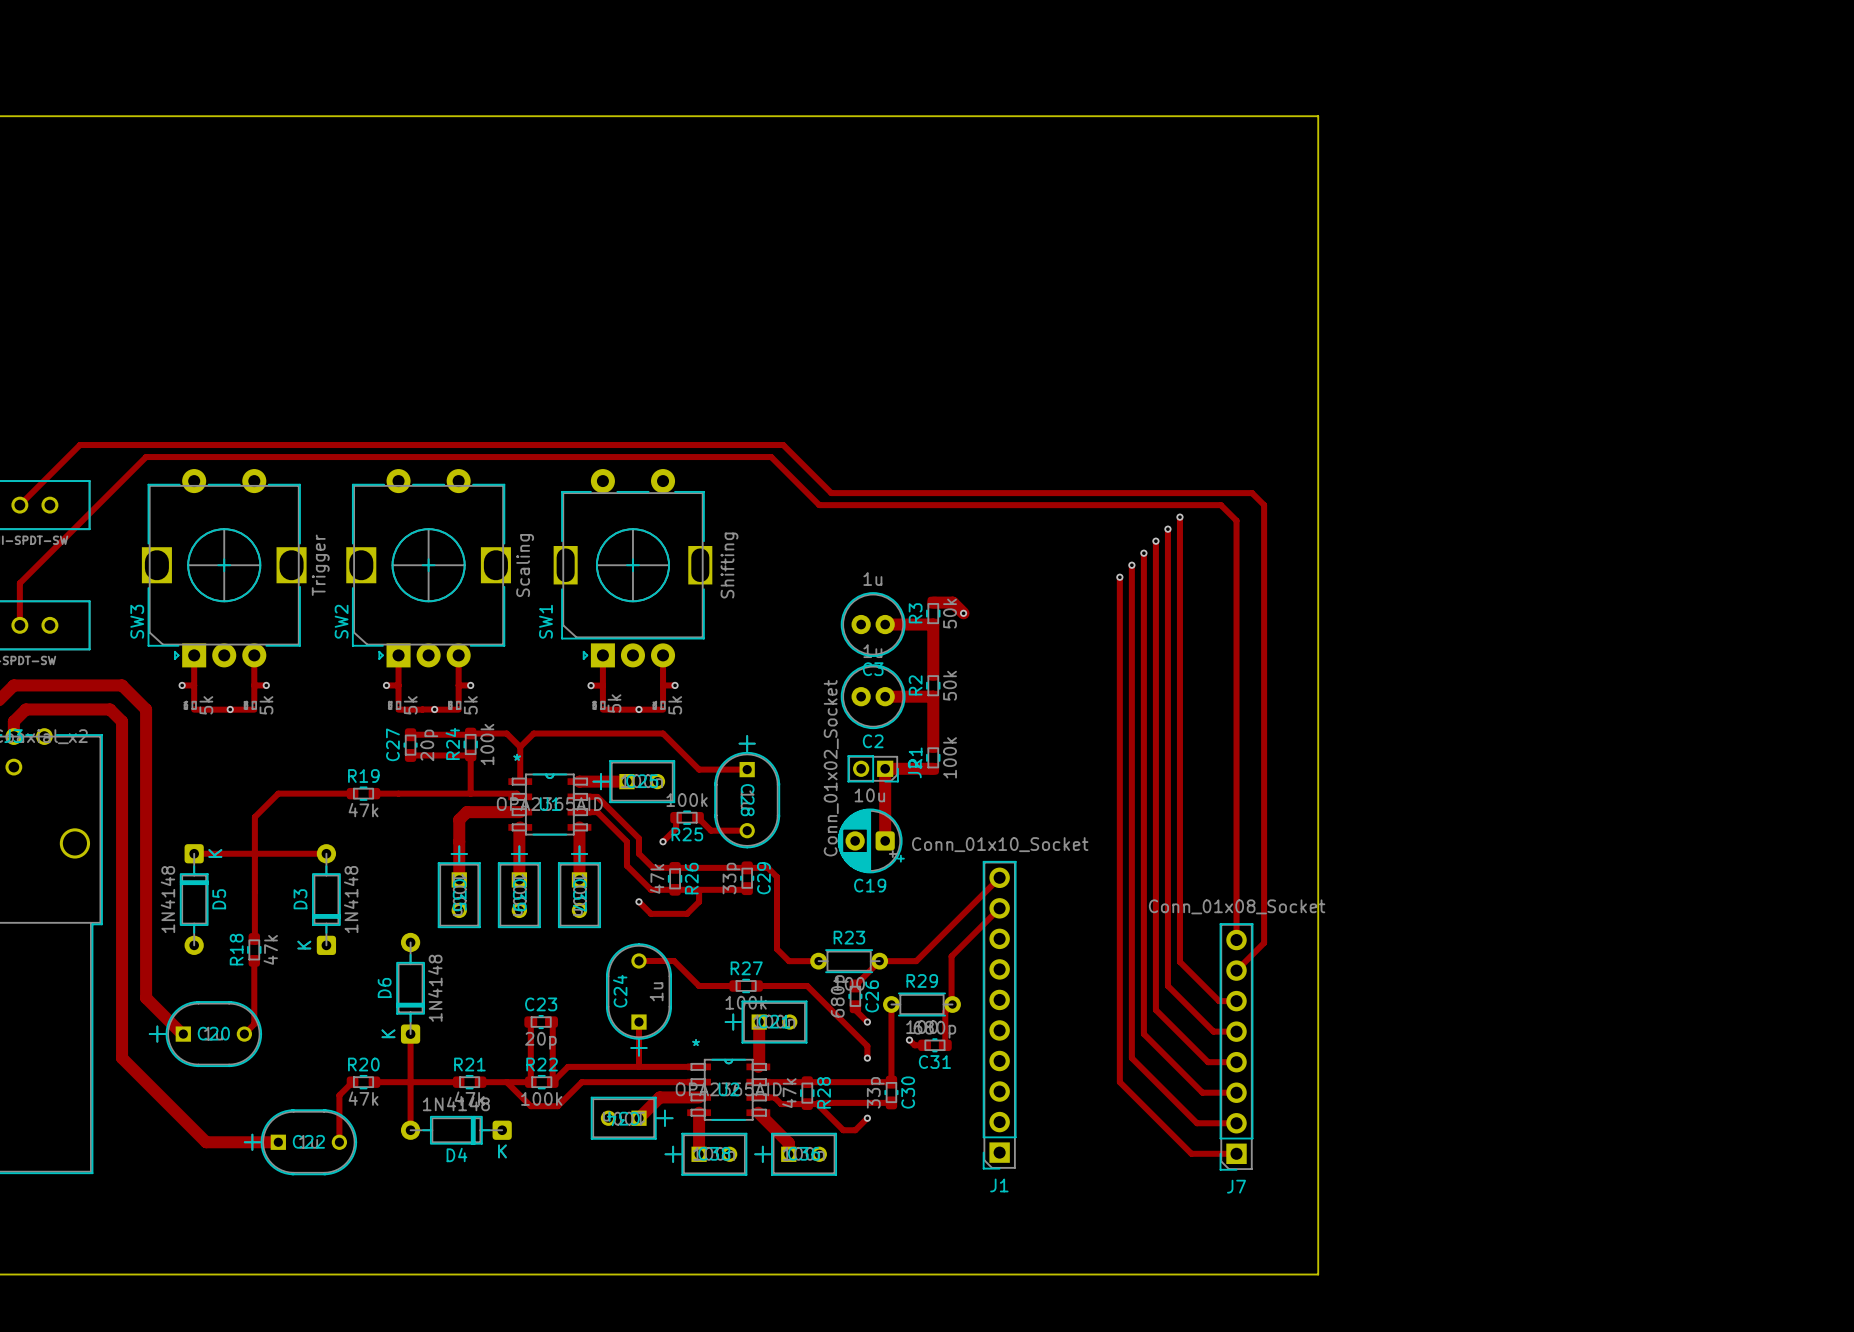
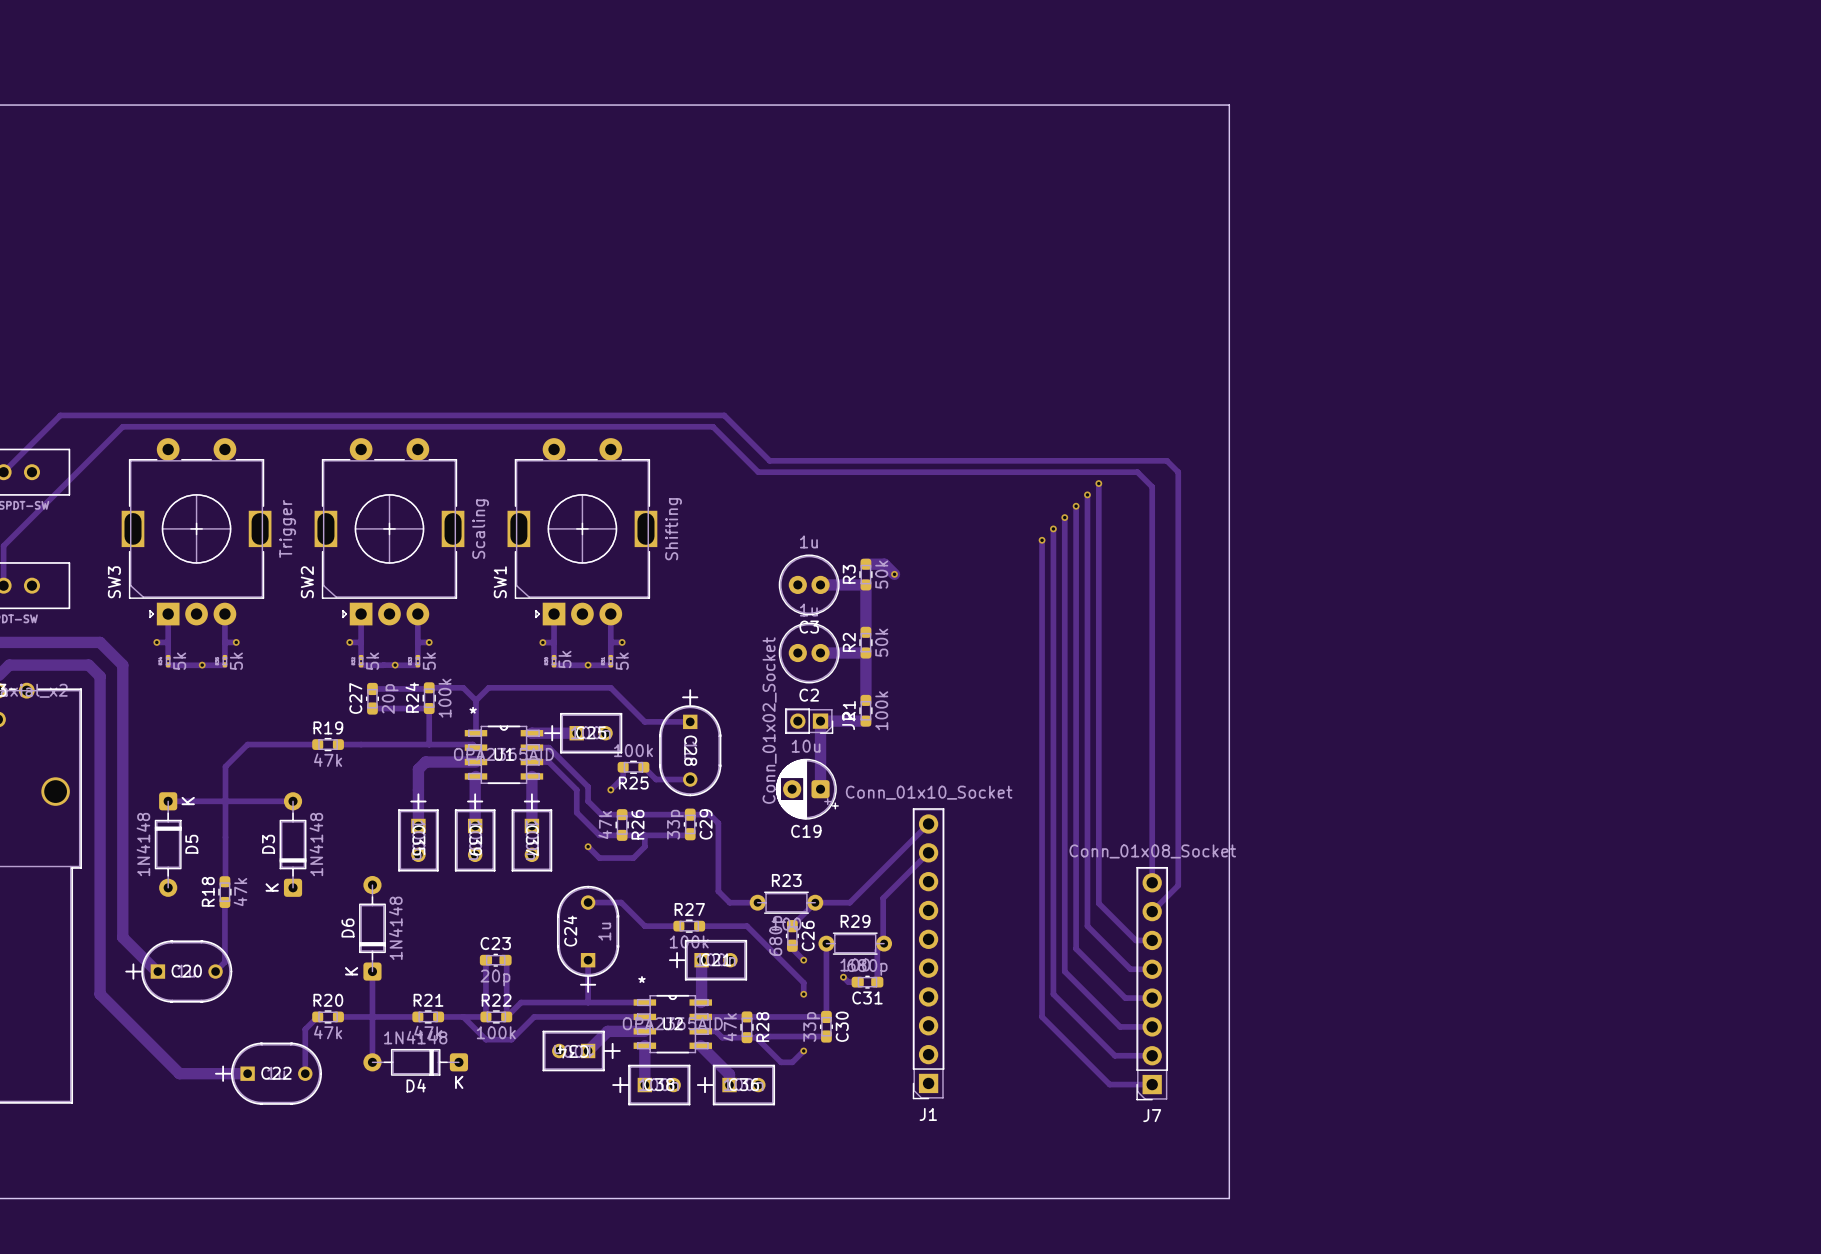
SW3 footprint: [141, 469, 307, 668] -> [121, 438, 272, 626]
SW2 footprint: [346, 469, 511, 668] -> [314, 438, 465, 626]

